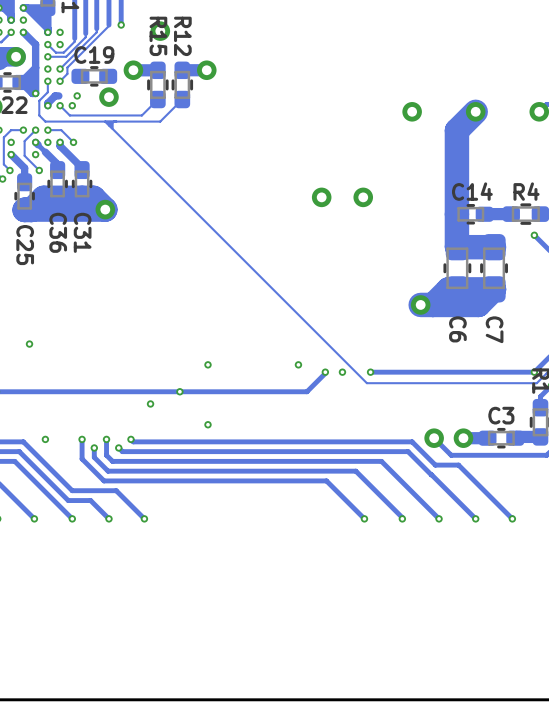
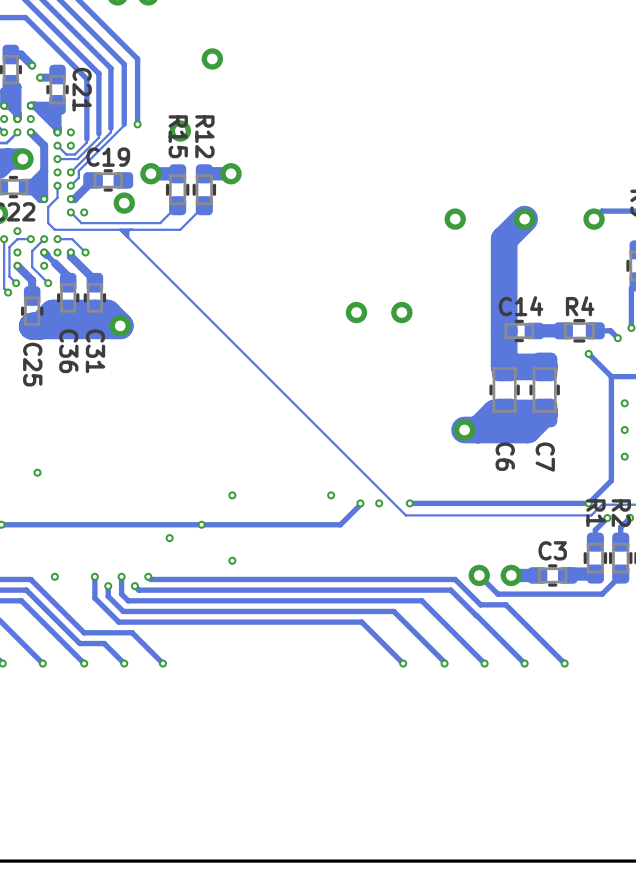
track: none -> (93, 180) (74, 199) (70, 199)
via: none -> (70, 199)
track: (58, 95) (55, 95) (47, 105) -> none
via: (77, 95) -> none
via: (47, 105) -> none
via: none -> (17, 231)

